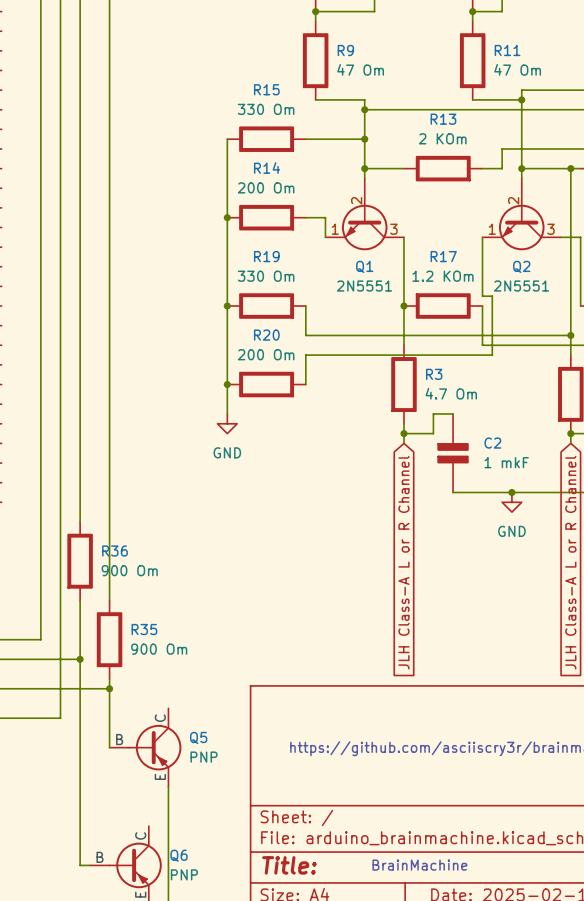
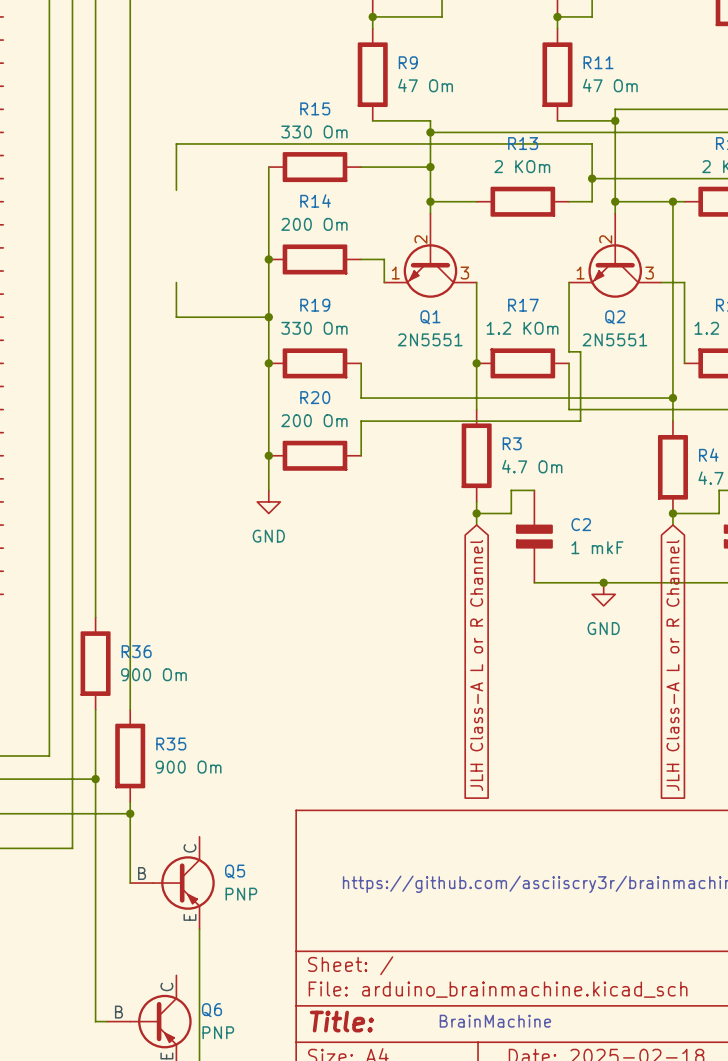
wire: none -> (592, 178) (592, 143) (176, 143) (176, 190)
junction: none -> (592, 178)
wire: none -> (176, 282) (176, 317) (268, 317)
junction: none -> (268, 317)

